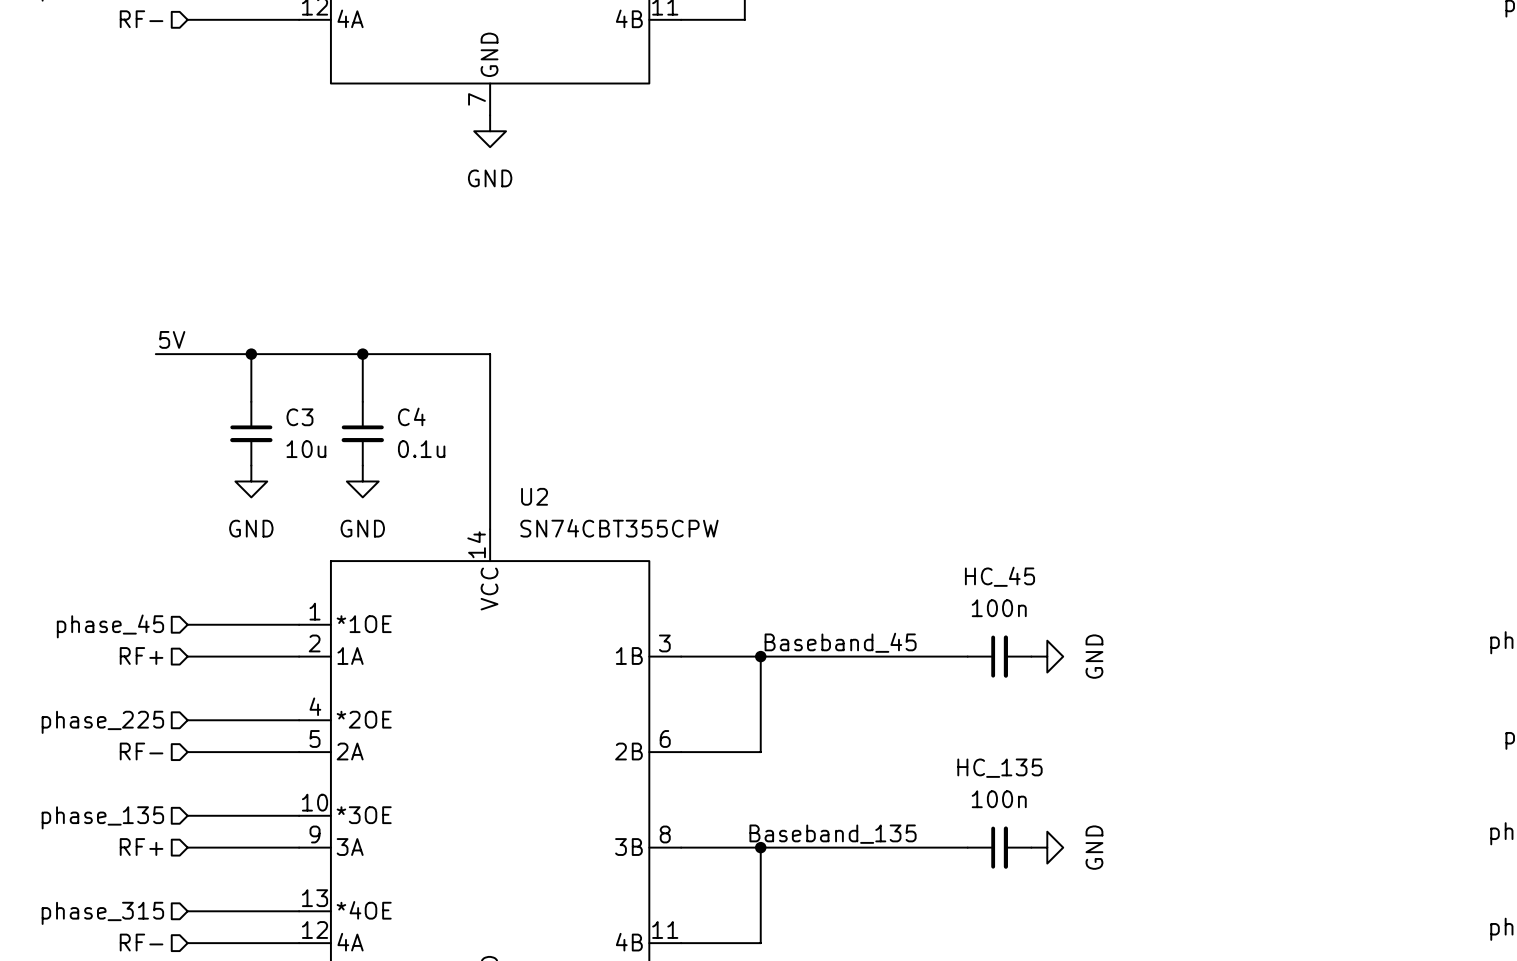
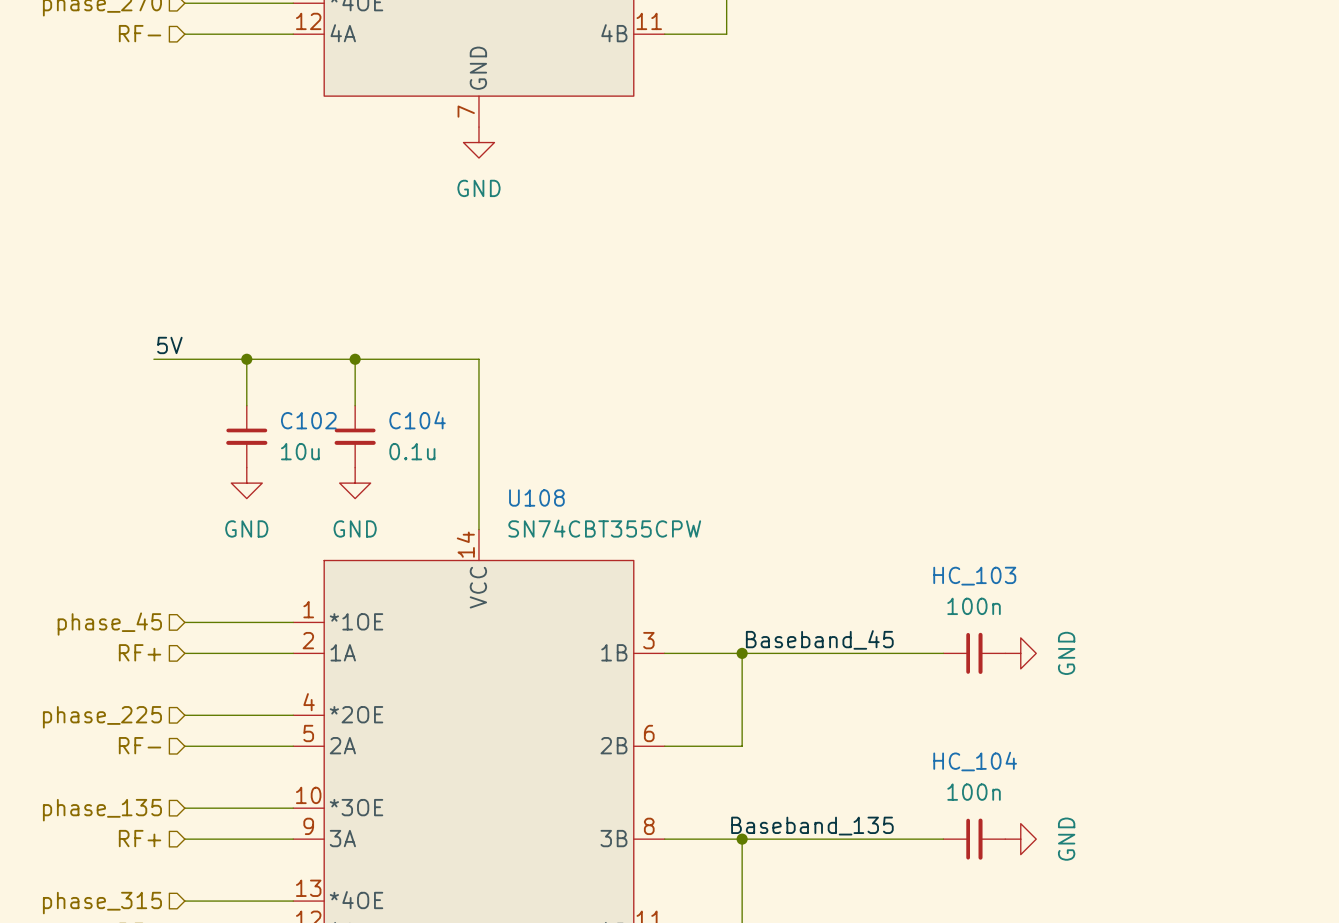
C4 name: C4 (411, 416) -> C104 (417, 420)
C3 name: C3 (299, 417) -> C102 (308, 420)
U2 name: U2 (534, 496) -> U108 (536, 498)
HC_45 name: HC_45 (999, 576) -> HC_103 (974, 576)
HC_135 name: HC_135 (999, 768) -> HC_104 (975, 761)

